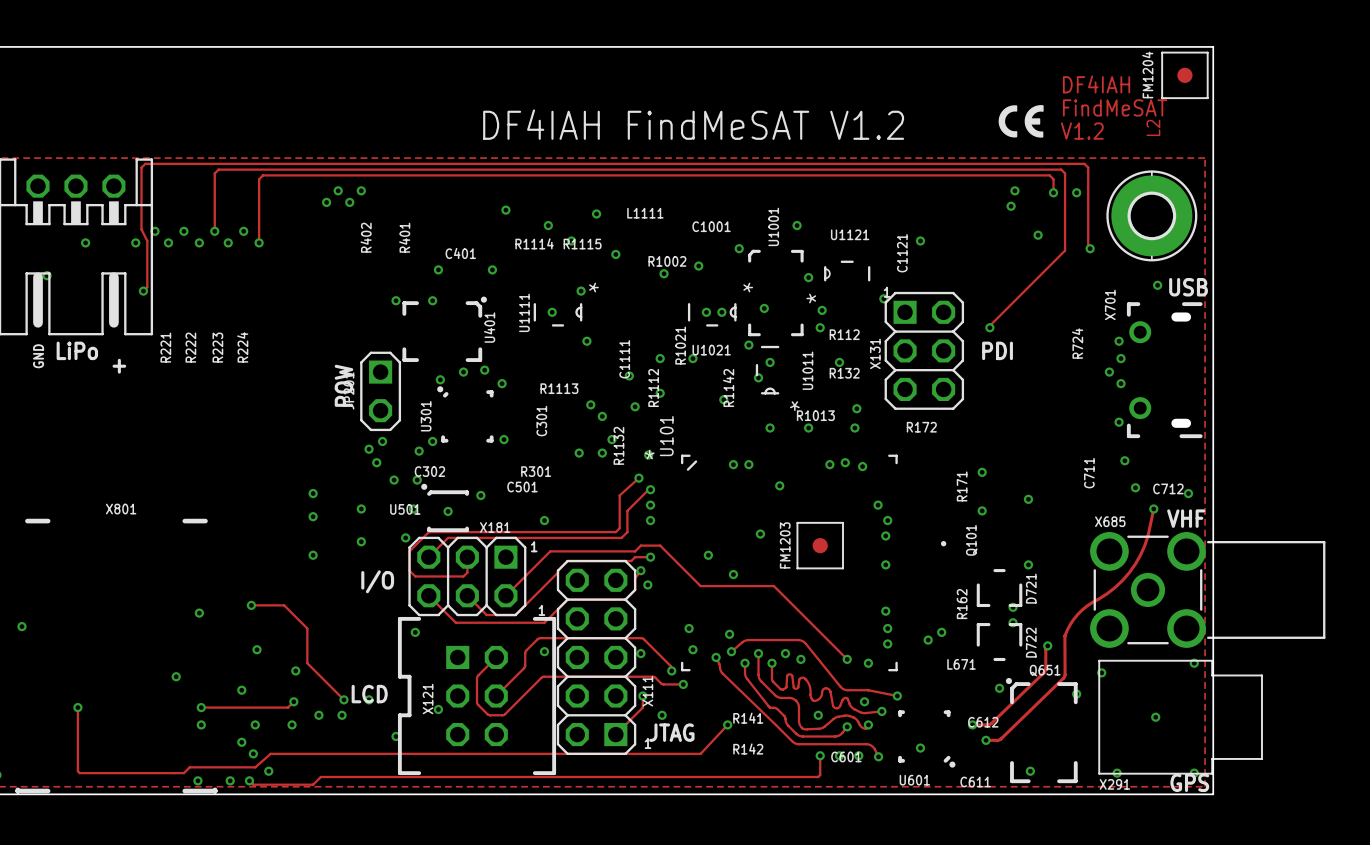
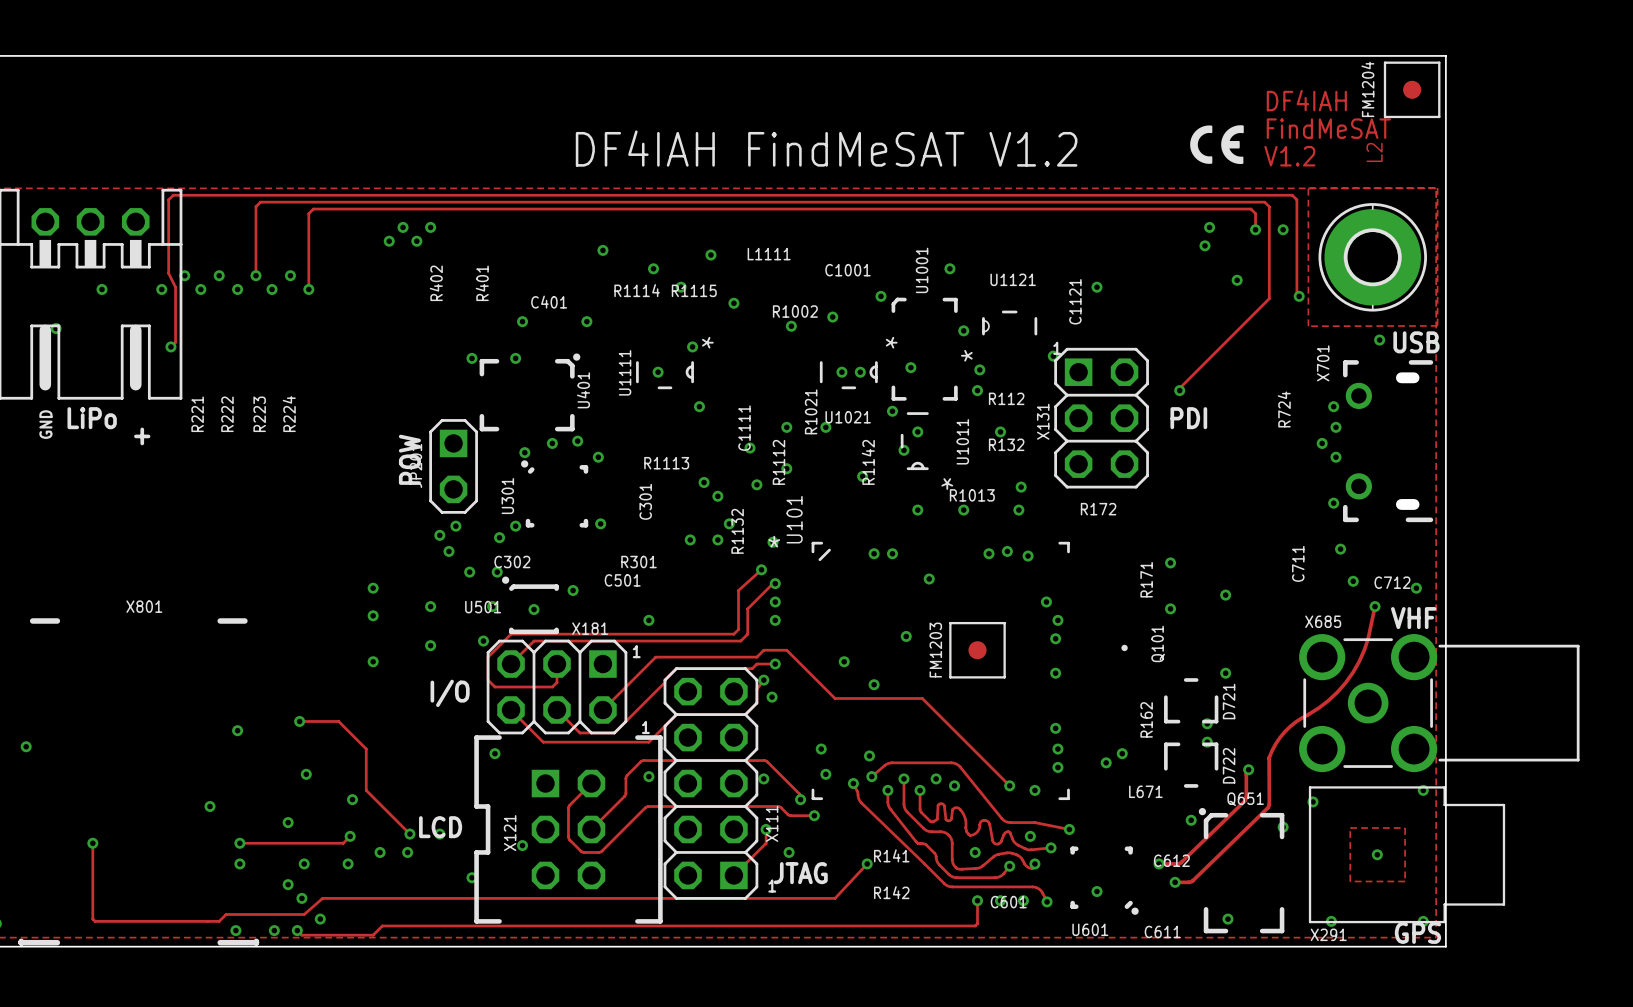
zone outline: none -> (1437, 188) (1308, 188) (1308, 326) (1437, 325) (1437, 188)
zone outline: none -> (1350, 828) (1405, 828) (1405, 881) (1350, 881) (1350, 828)

